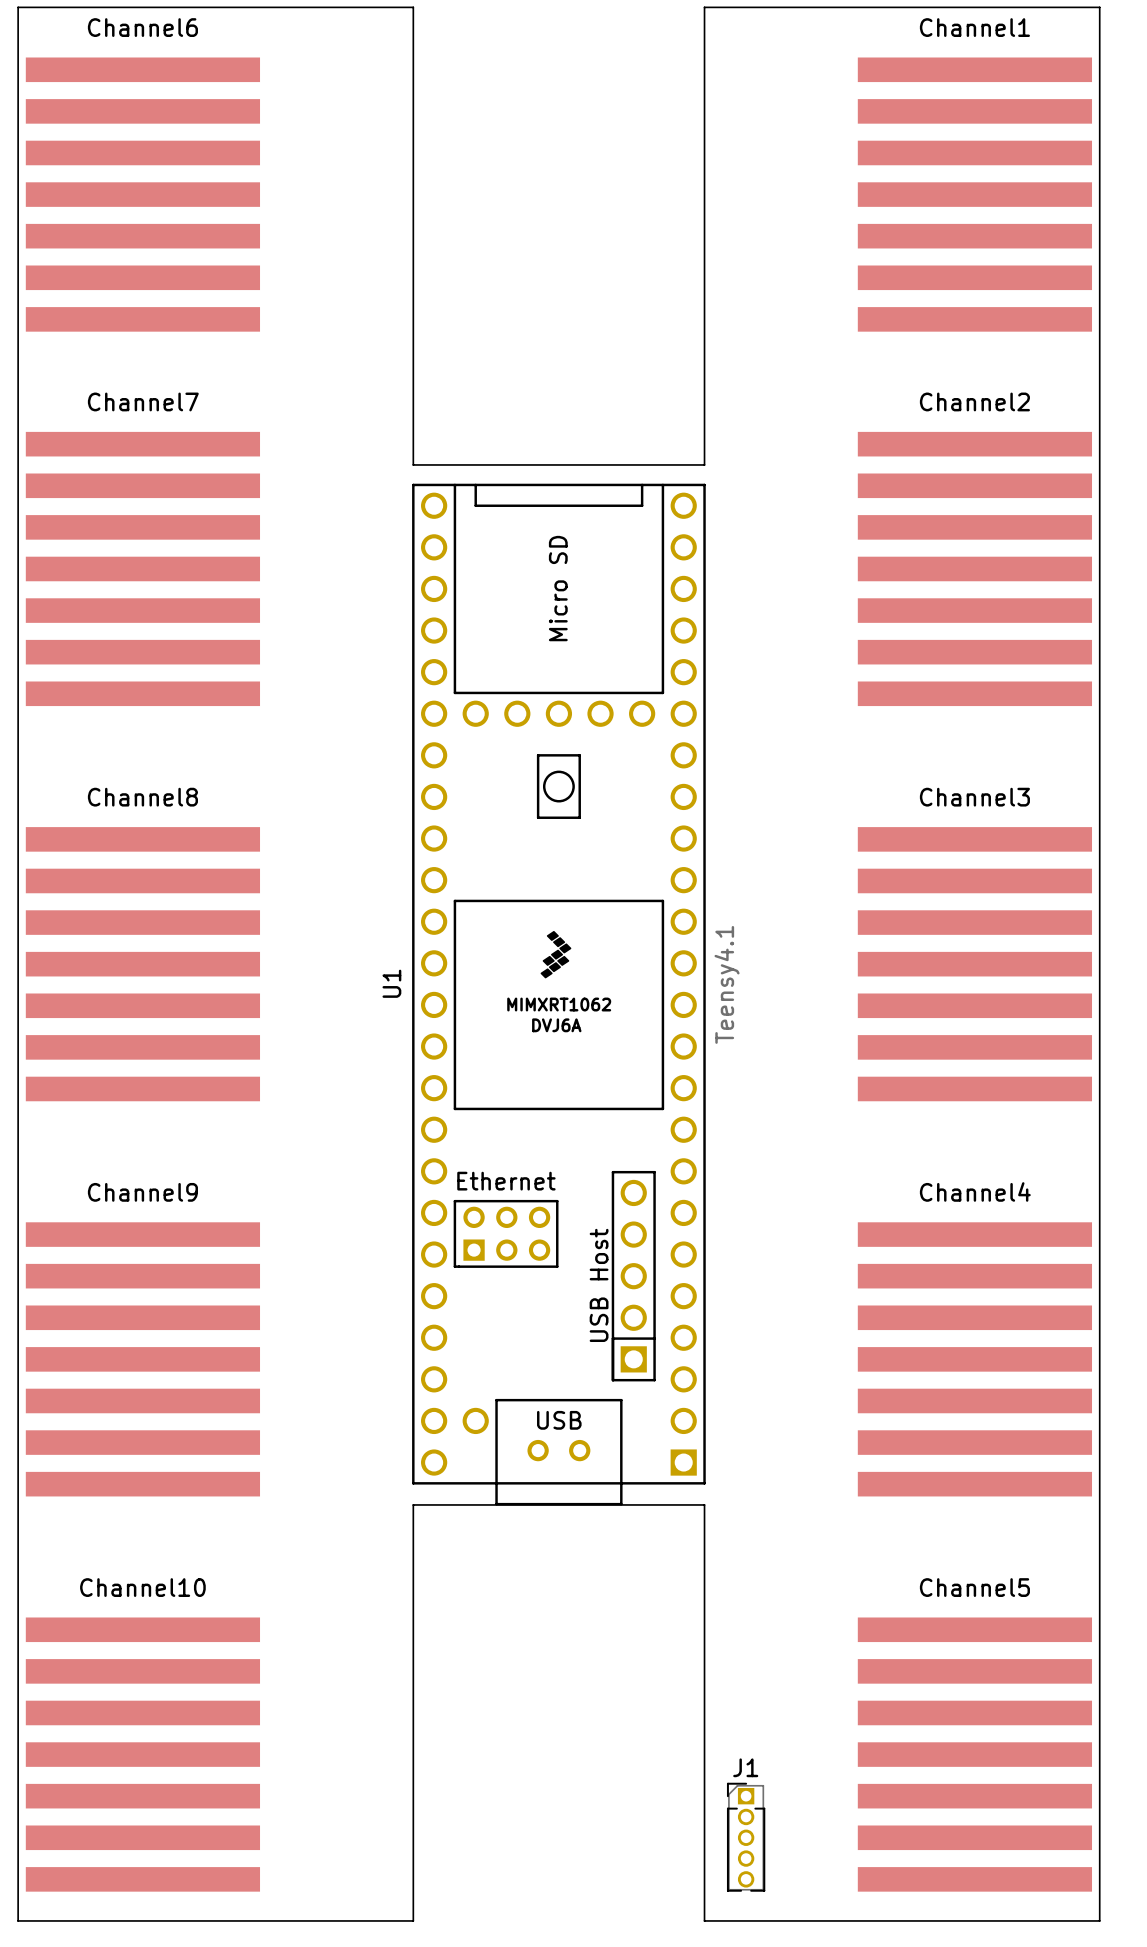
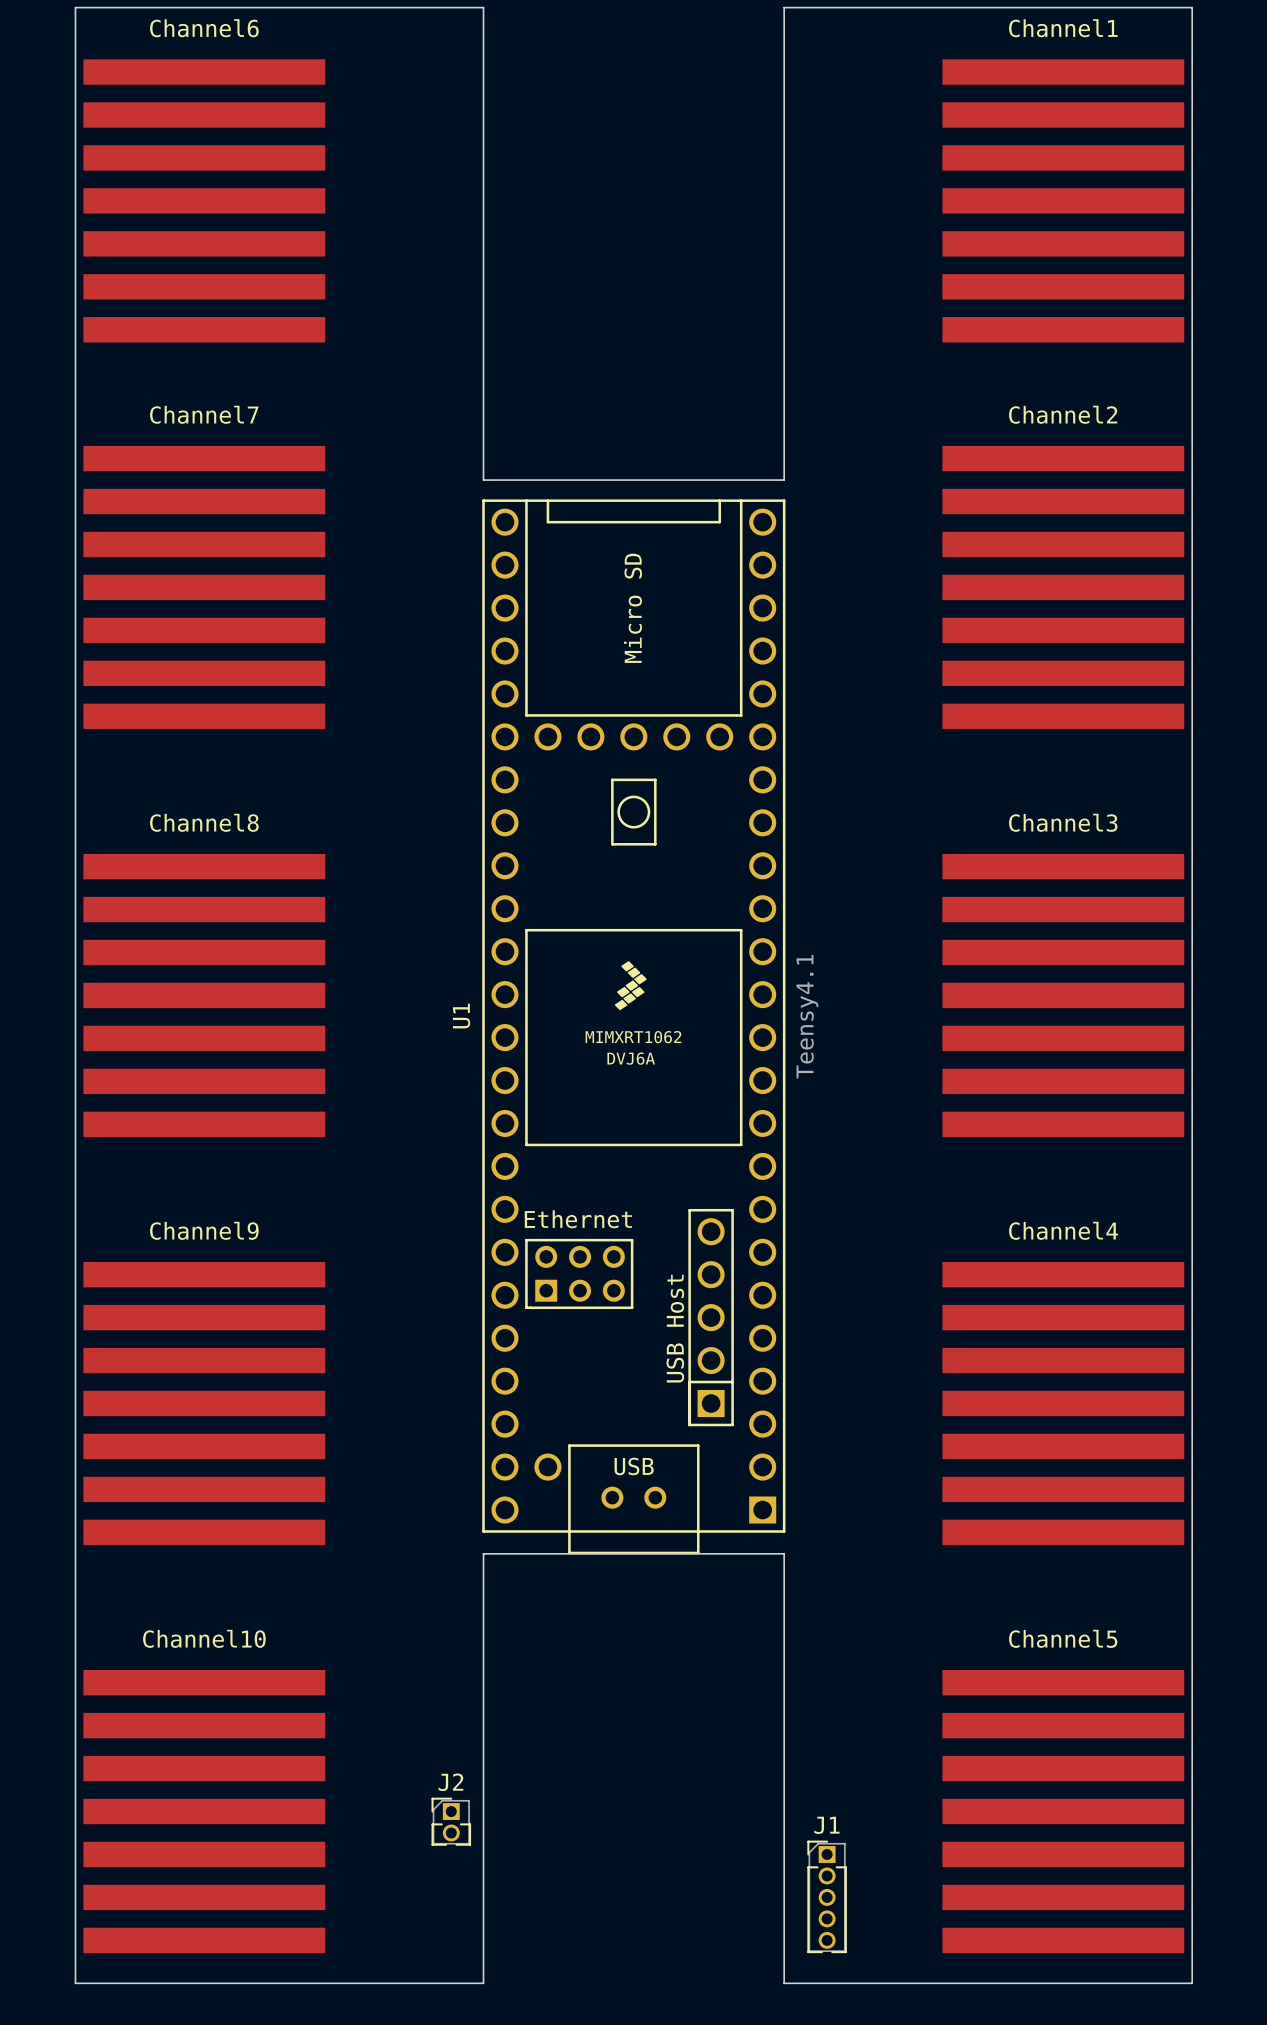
J2: none -> (451, 1821)

